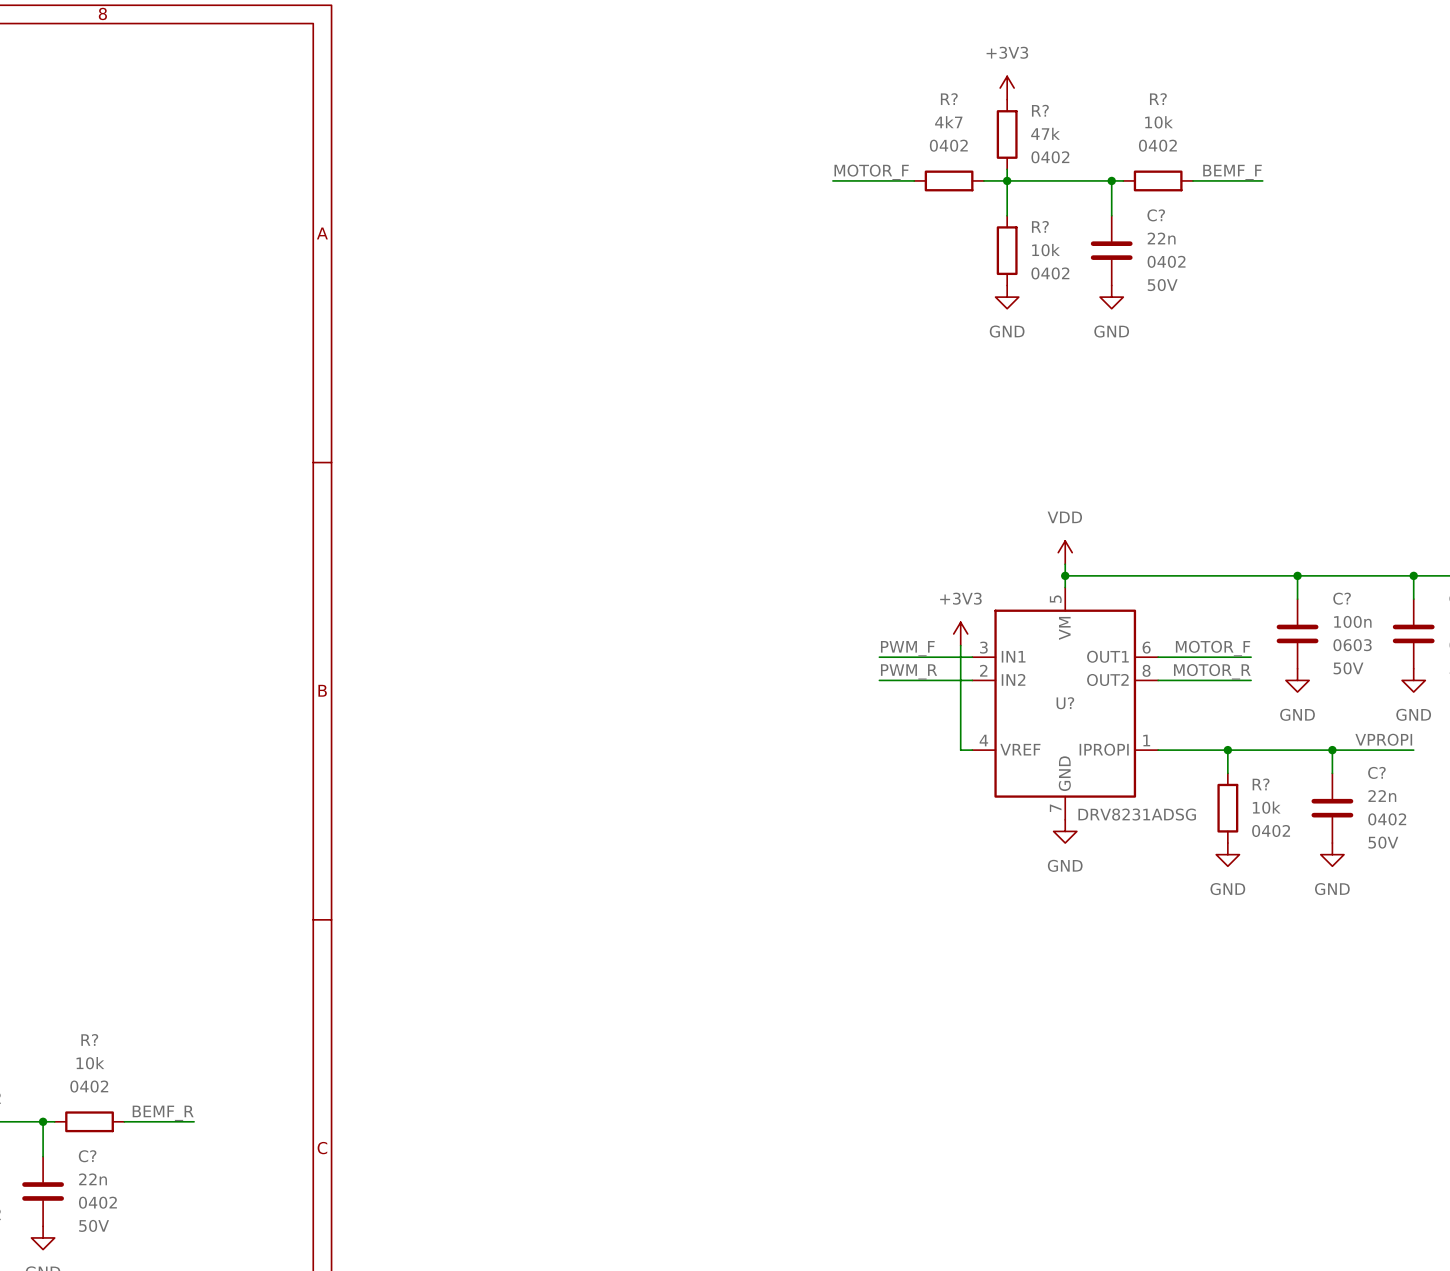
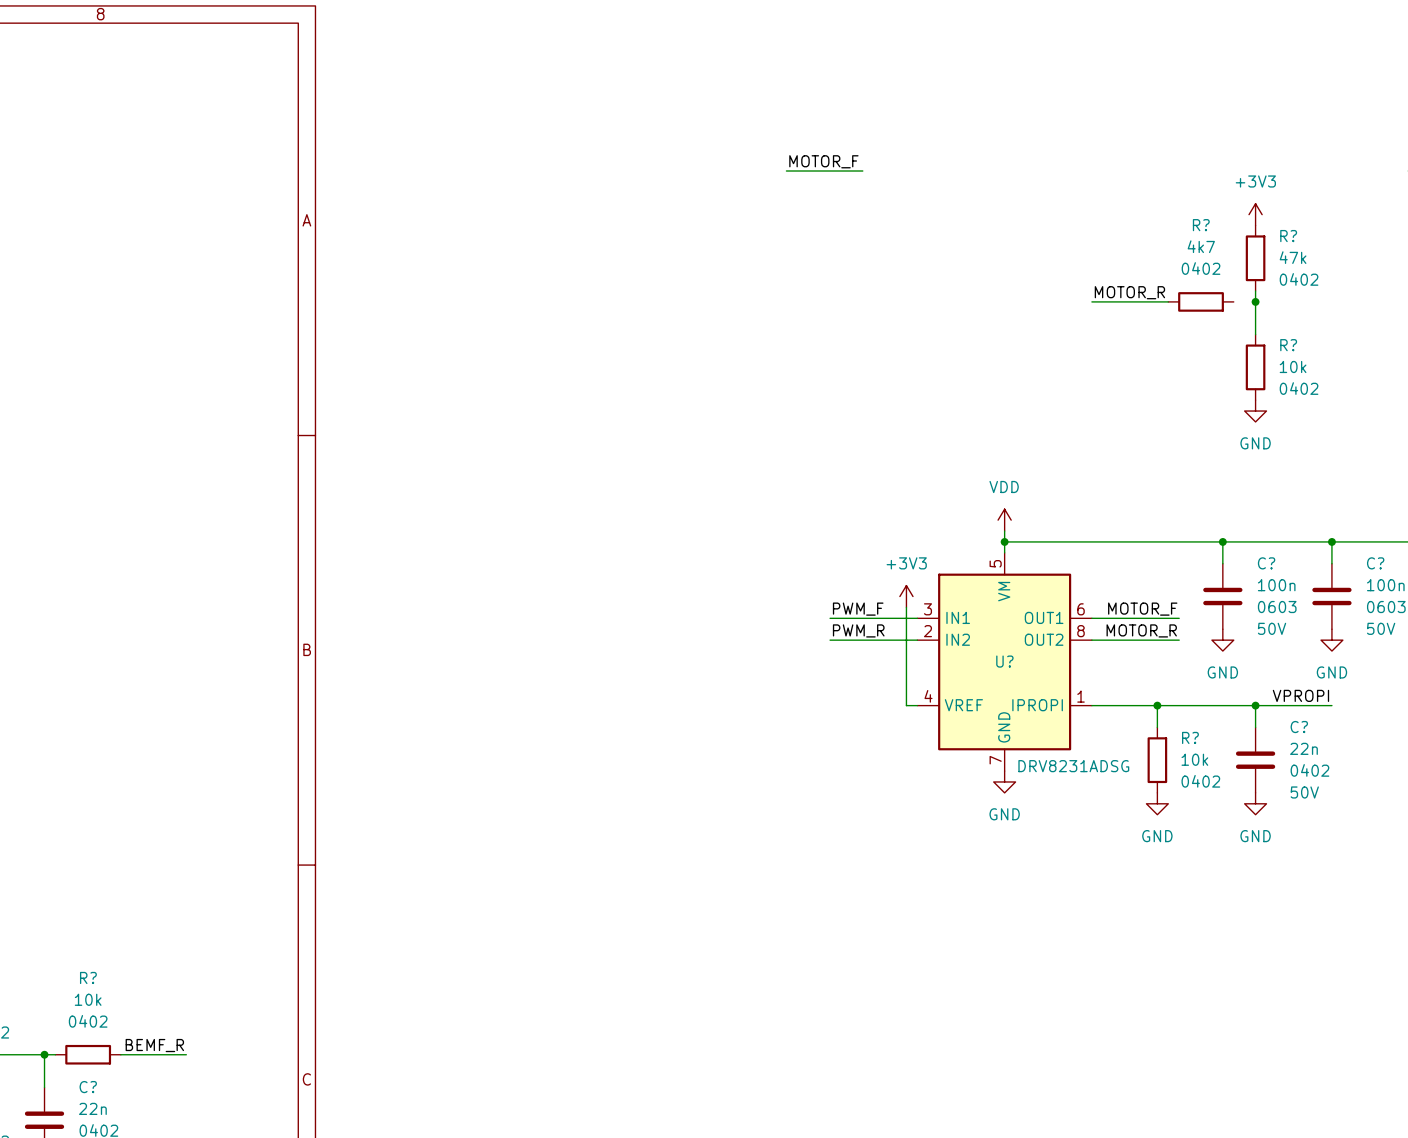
power symbol: +3V3 (1007, 88) -> none
R?: 47k (1007, 134) -> none
wire: (1007, 169) (1007, 215) -> none
label: BEMF_F (1232, 172) -> none
R?: 4k7 (949, 180) -> none
wire: (983, 180) (1123, 180) -> none
junction: (1007, 180) -> none
wire: (1111, 180) (1111, 215) -> none
junction: (1111, 180) -> none
R?: 10k (1158, 180) -> none
wire: (1193, 180) (1262, 180) -> none
power symbol: none -> +3V3 (1255, 214)
R?: 10k (1007, 250) -> none
C?: 22n (1111, 250) -> none
R?: none -> 47k (1255, 258)
power symbol: GND (1007, 297) -> none
power symbol: GND (1111, 297) -> none
wire: none -> (1255, 291) (1255, 334)
label: none -> MOTOR_R (1129, 292)
wire: none -> (1091, 301) (1168, 301)
R?: none -> 4k7 (1201, 301)
junction: none -> (1255, 301)
R?: none -> 10k (1255, 367)
power symbol: none -> GND (1255, 411)

